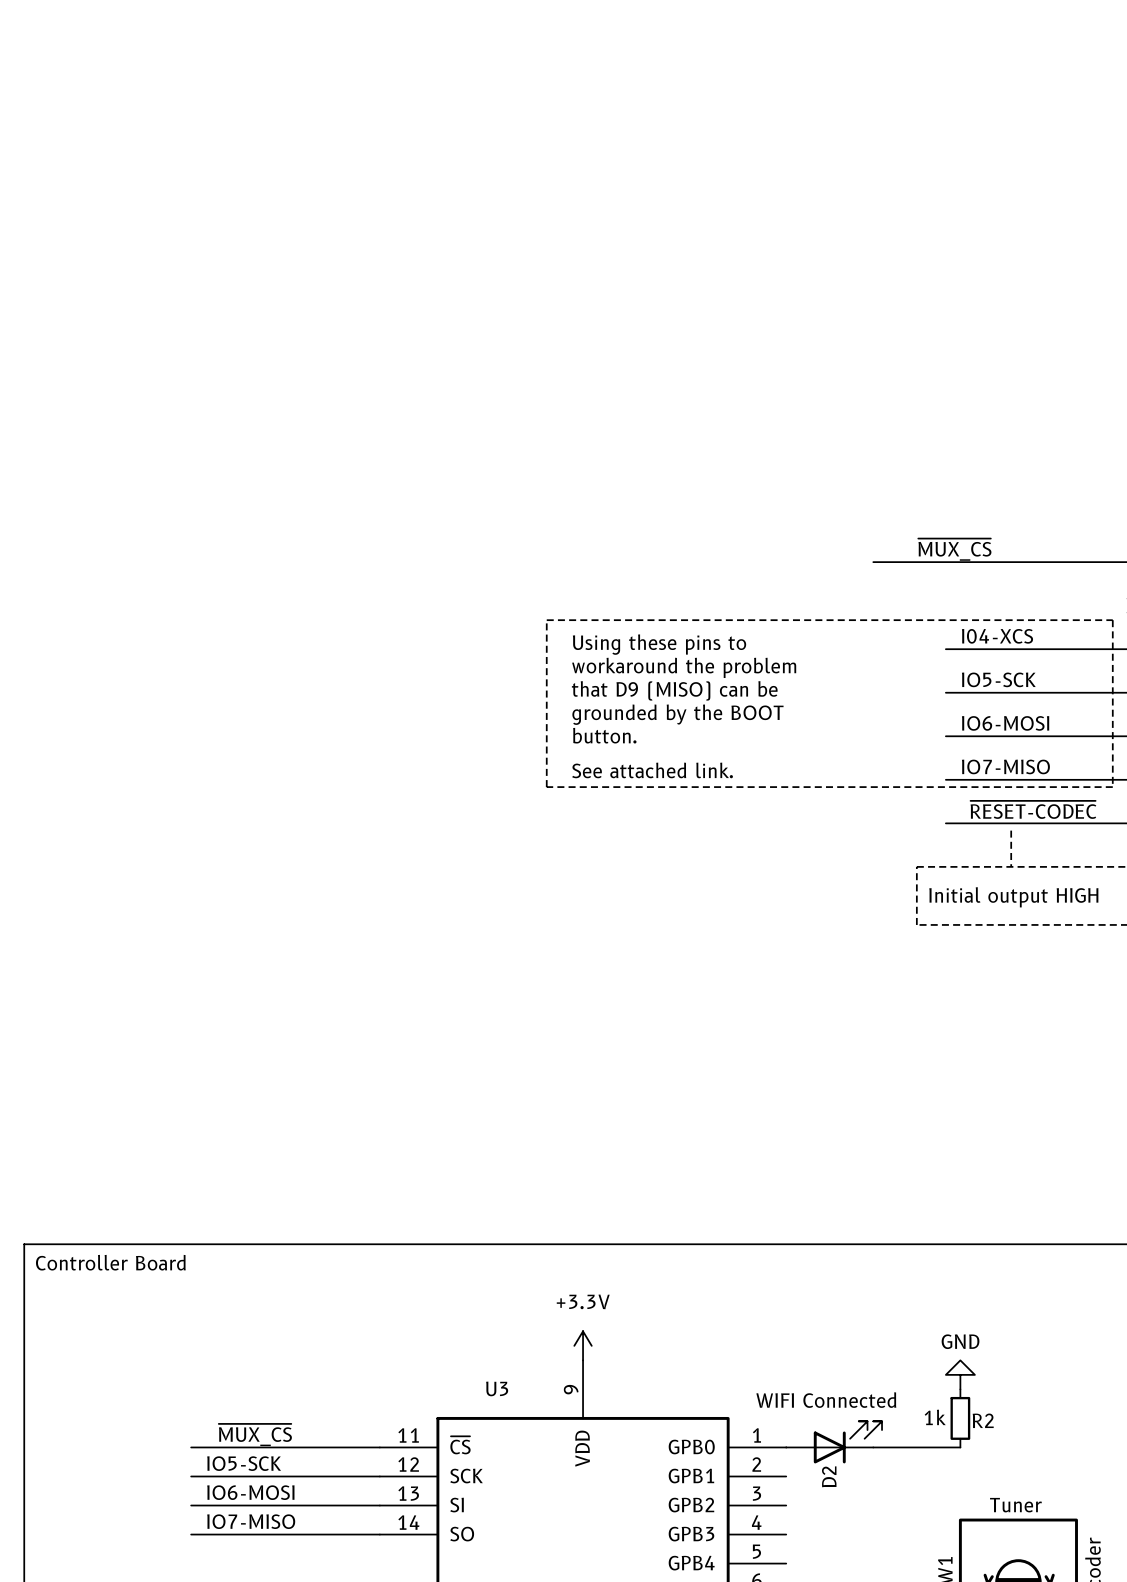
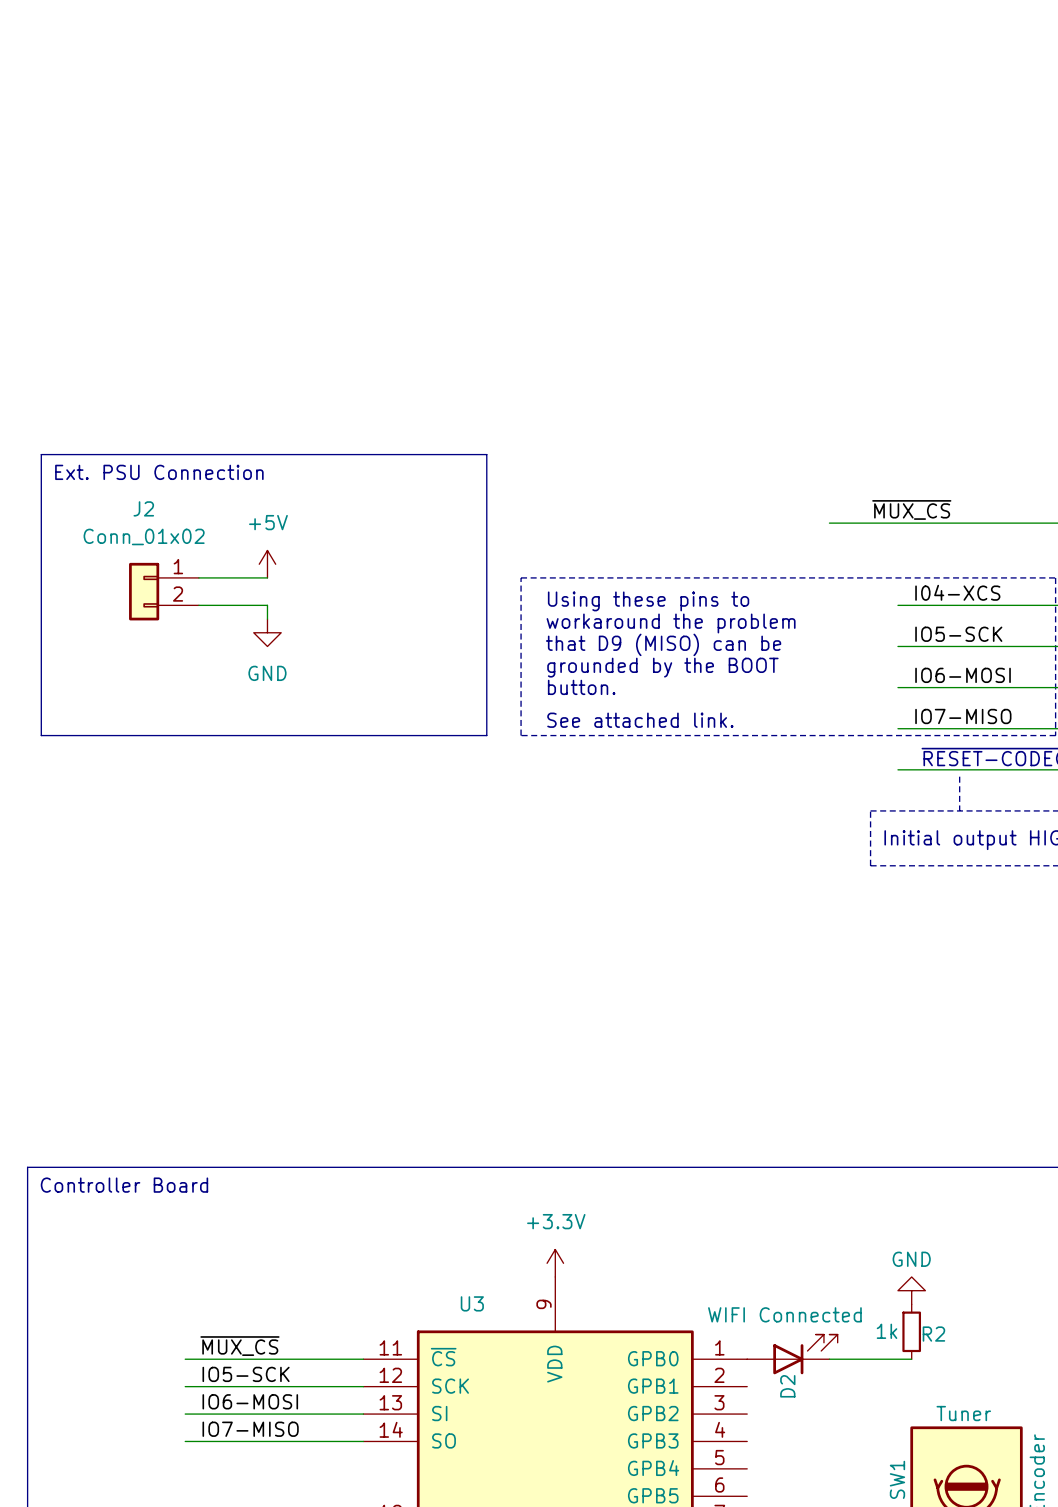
line: none -> (41, 454) (486, 454) (486, 735) (41, 735) (41, 454)
text: none -> Ext. PSU Connection (159, 472)
power symbol: none -> +5V (267, 564)
wire: none -> (198, 577) (267, 577)
J2: none -> Conn_01x02 (163, 591)
wire: none -> (198, 605) (267, 605) (267, 619)
power symbol: none -> GND (267, 632)

